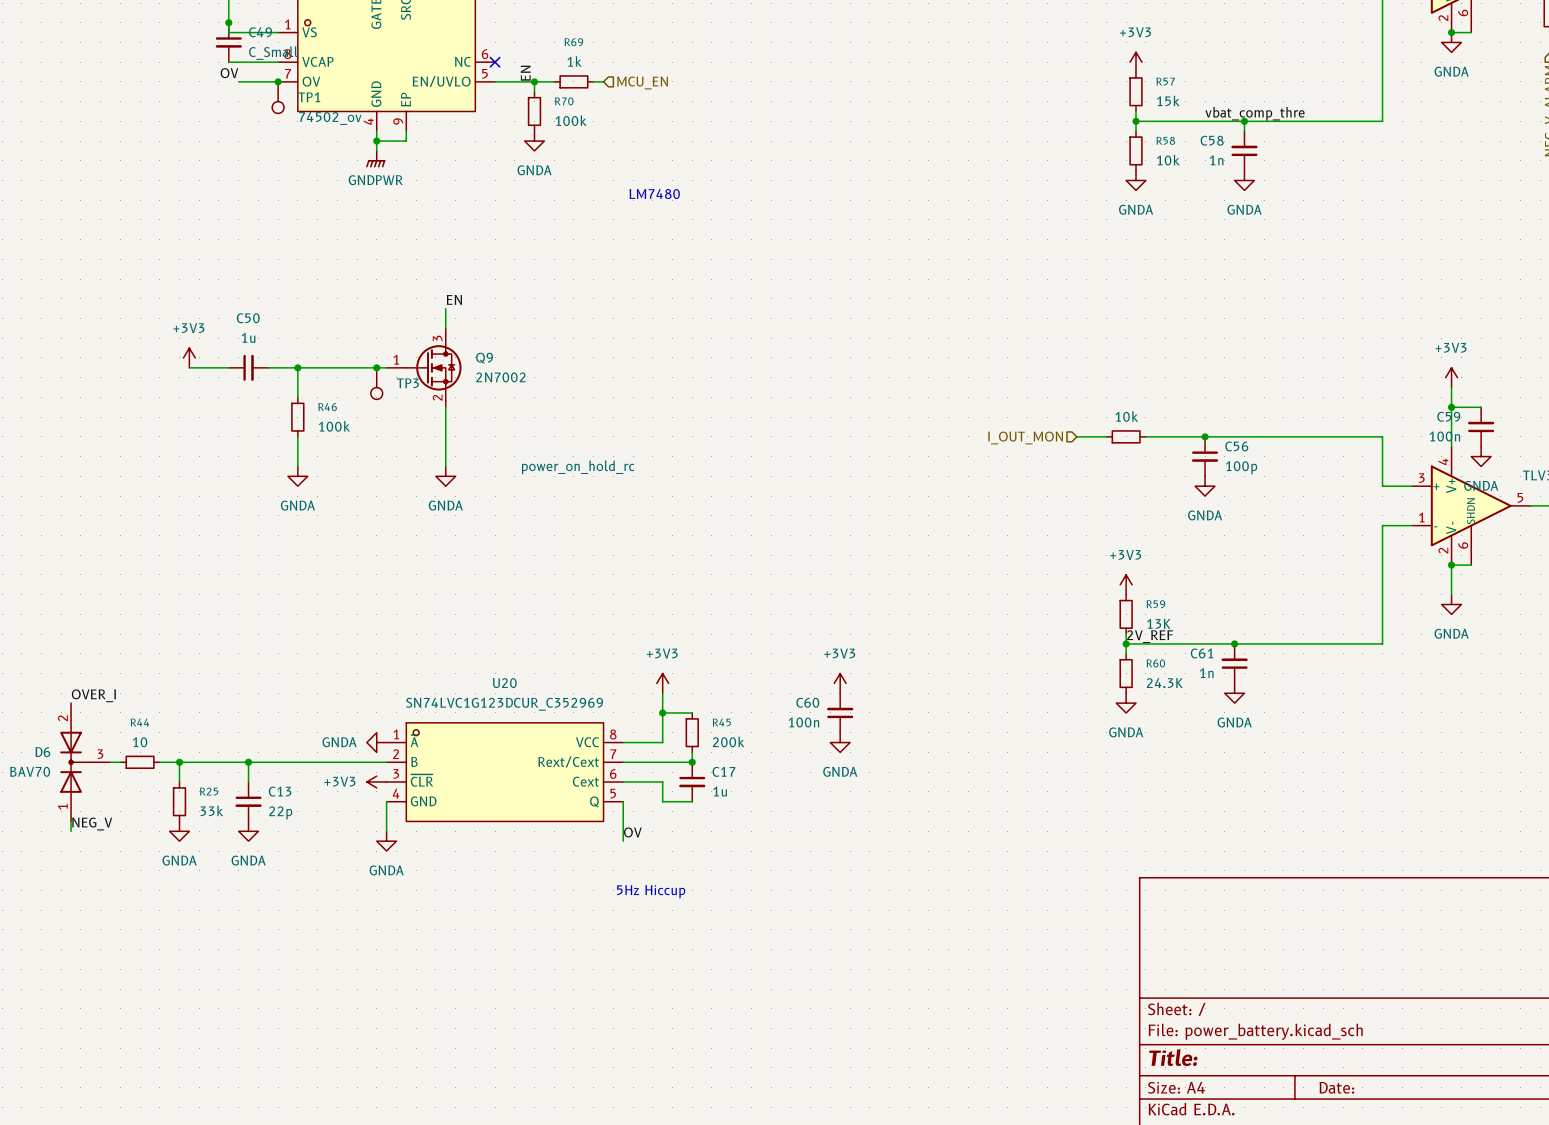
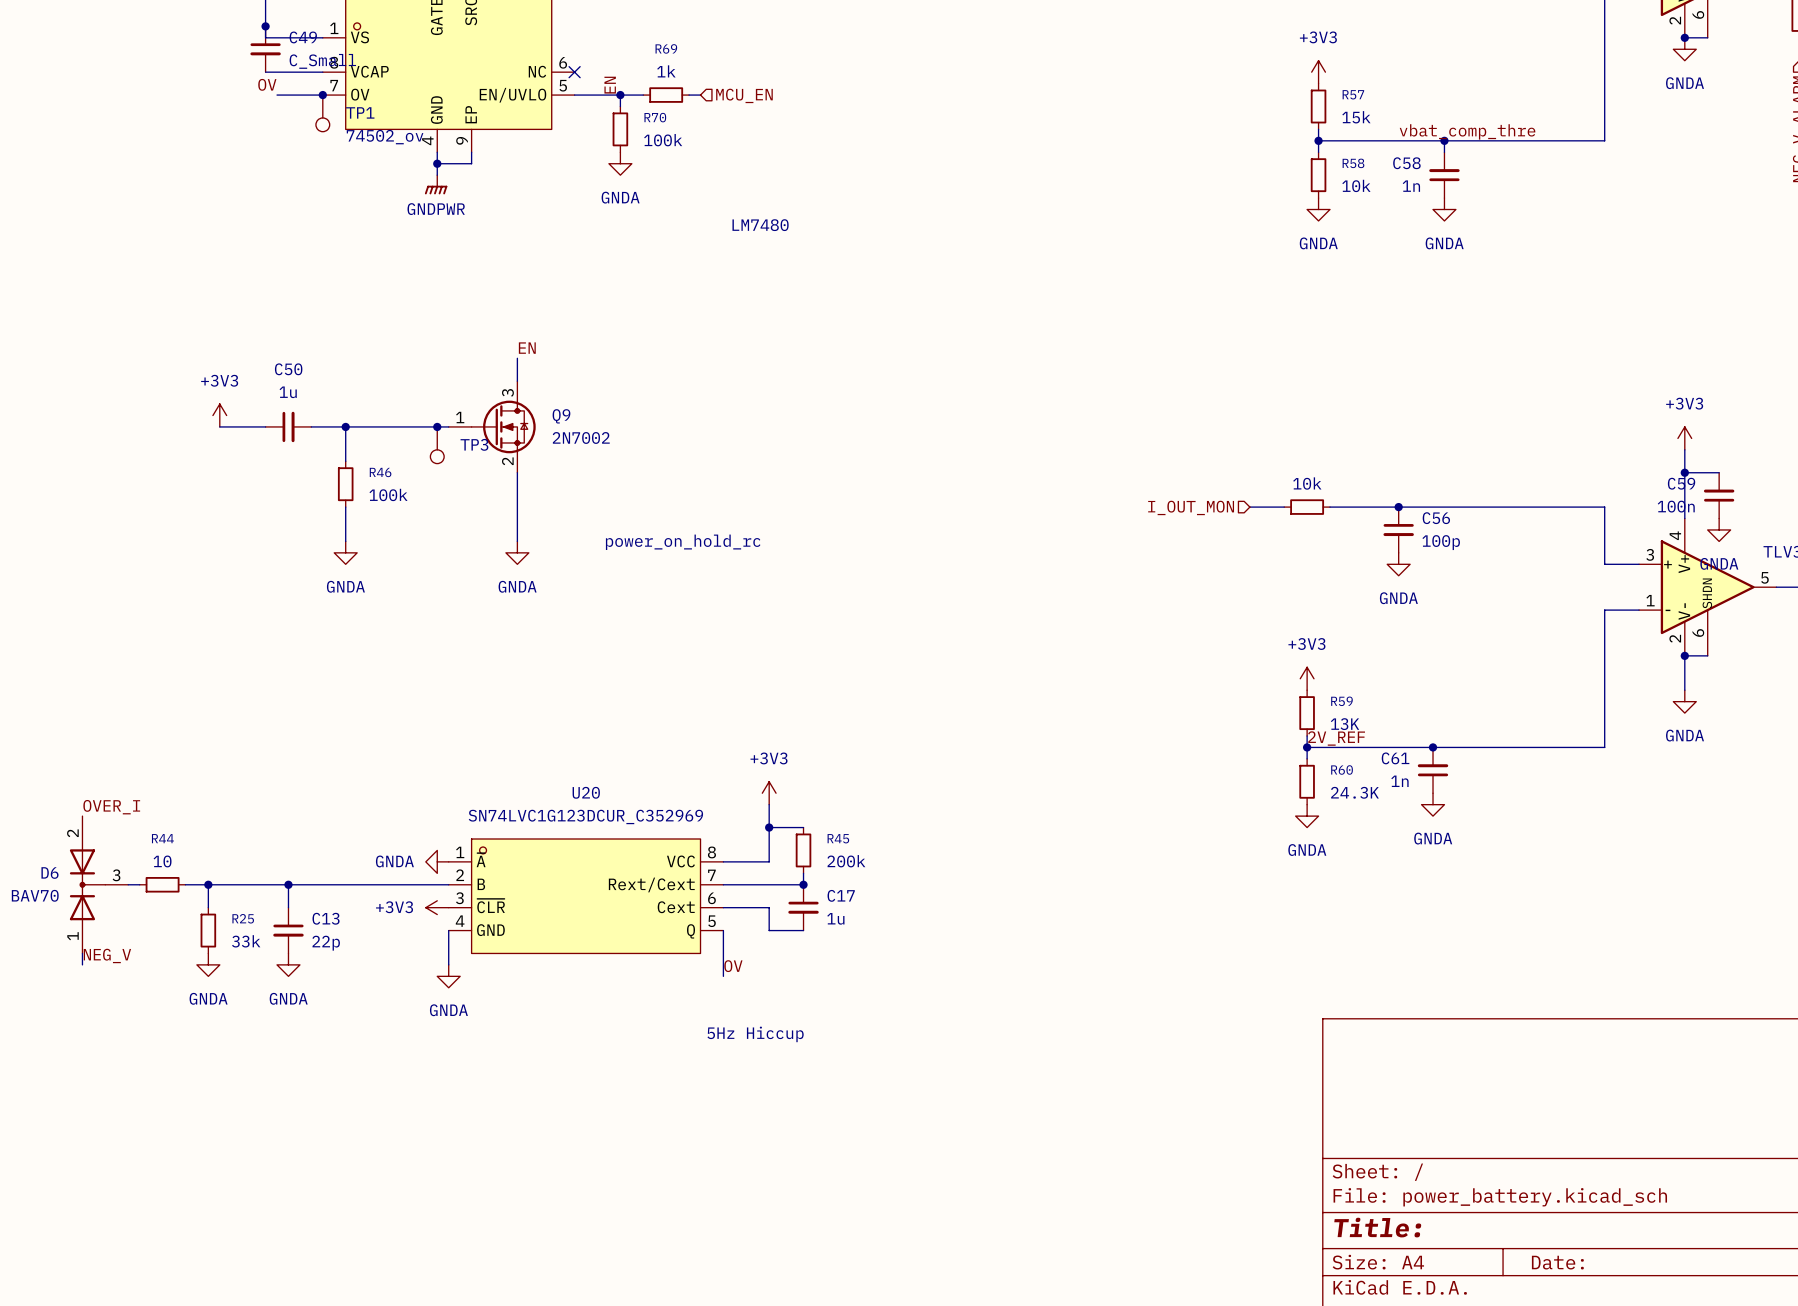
power symbol: +3V3 (840, 683) -> none
C60: 100n (840, 712) -> none
power symbol: GNDA (840, 742) -> none

